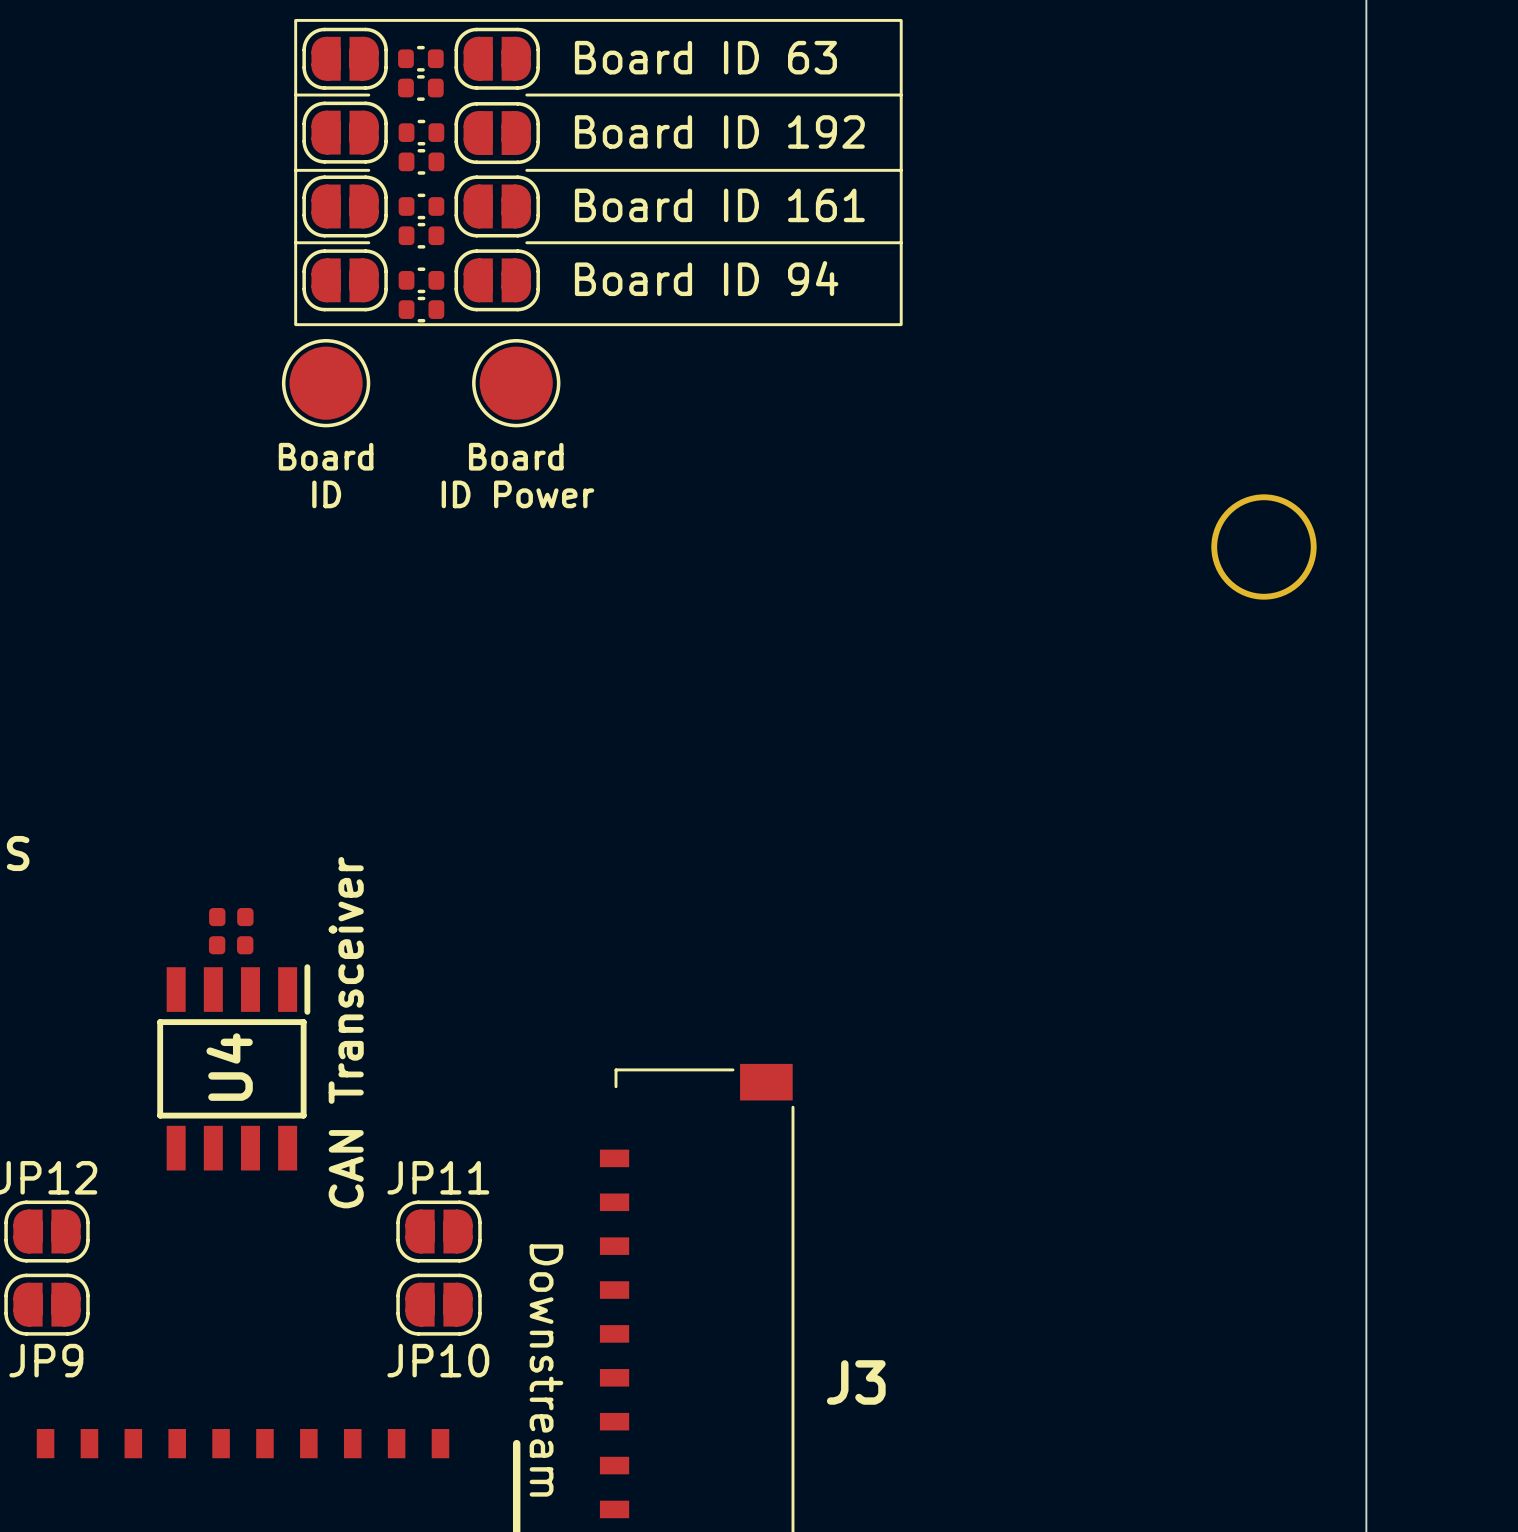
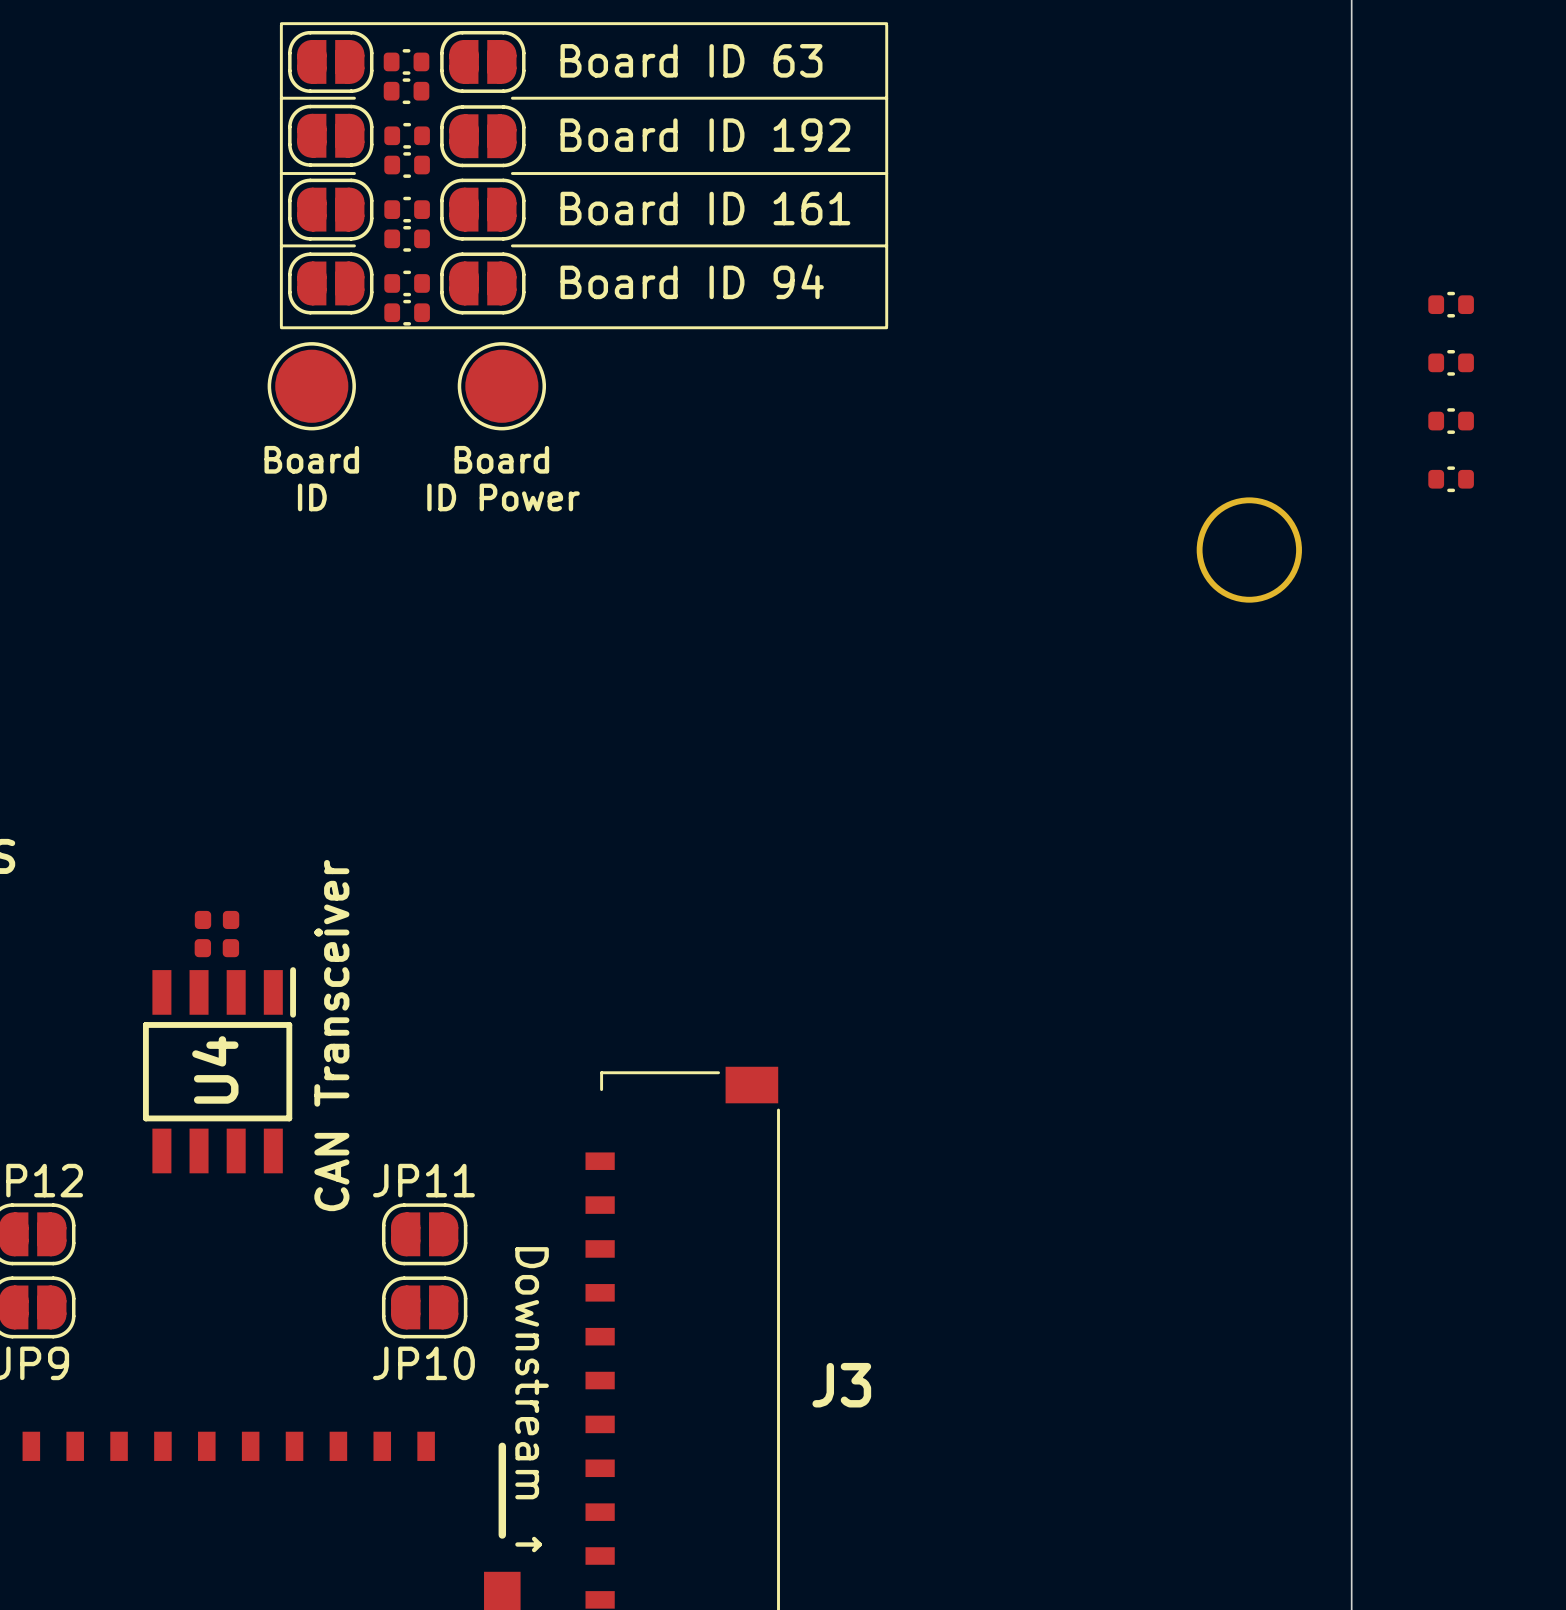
part: none -> (1451, 304)
part: none -> (1451, 362)
part: none -> (1451, 421)
part: none -> (1451, 479)

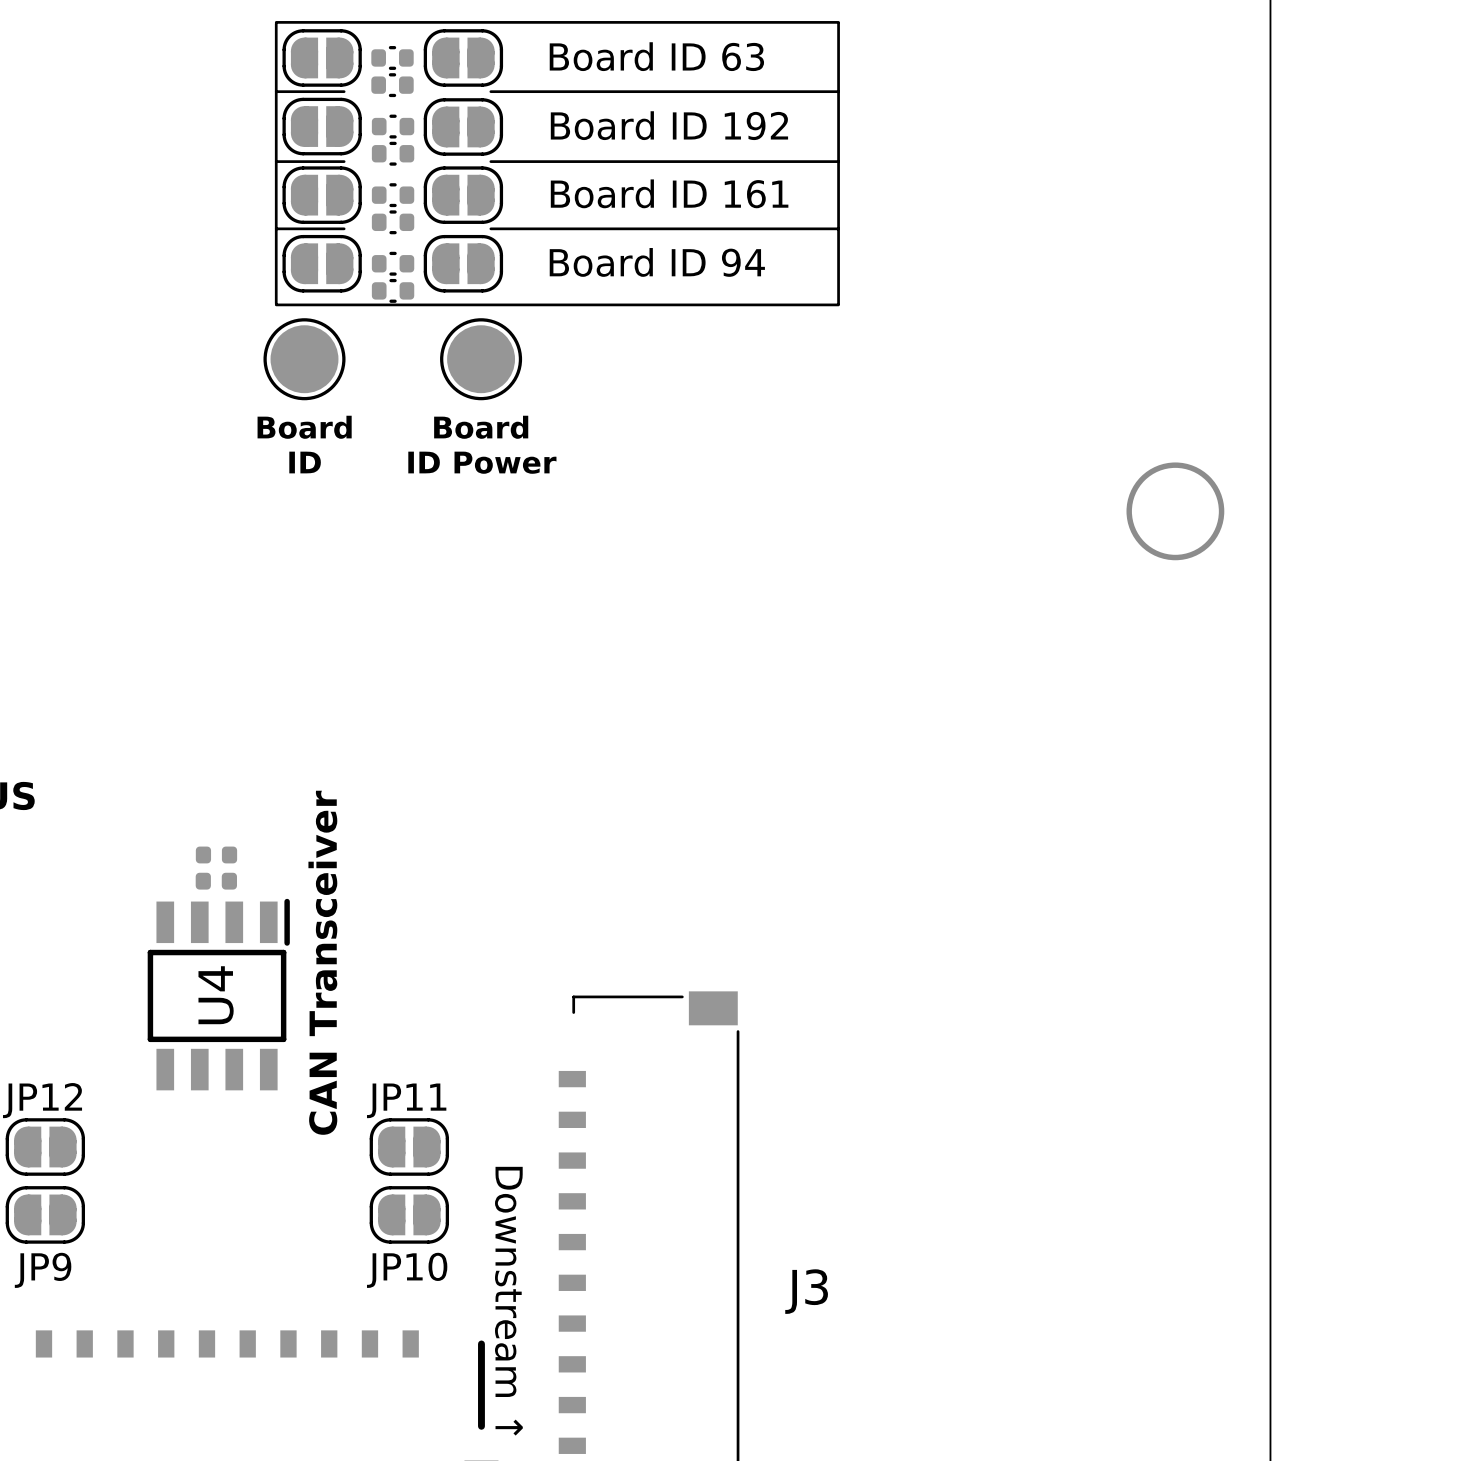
part: (1451, 304) -> none
part: (1451, 362) -> none
part: (1451, 421) -> none
part: (1451, 479) -> none

